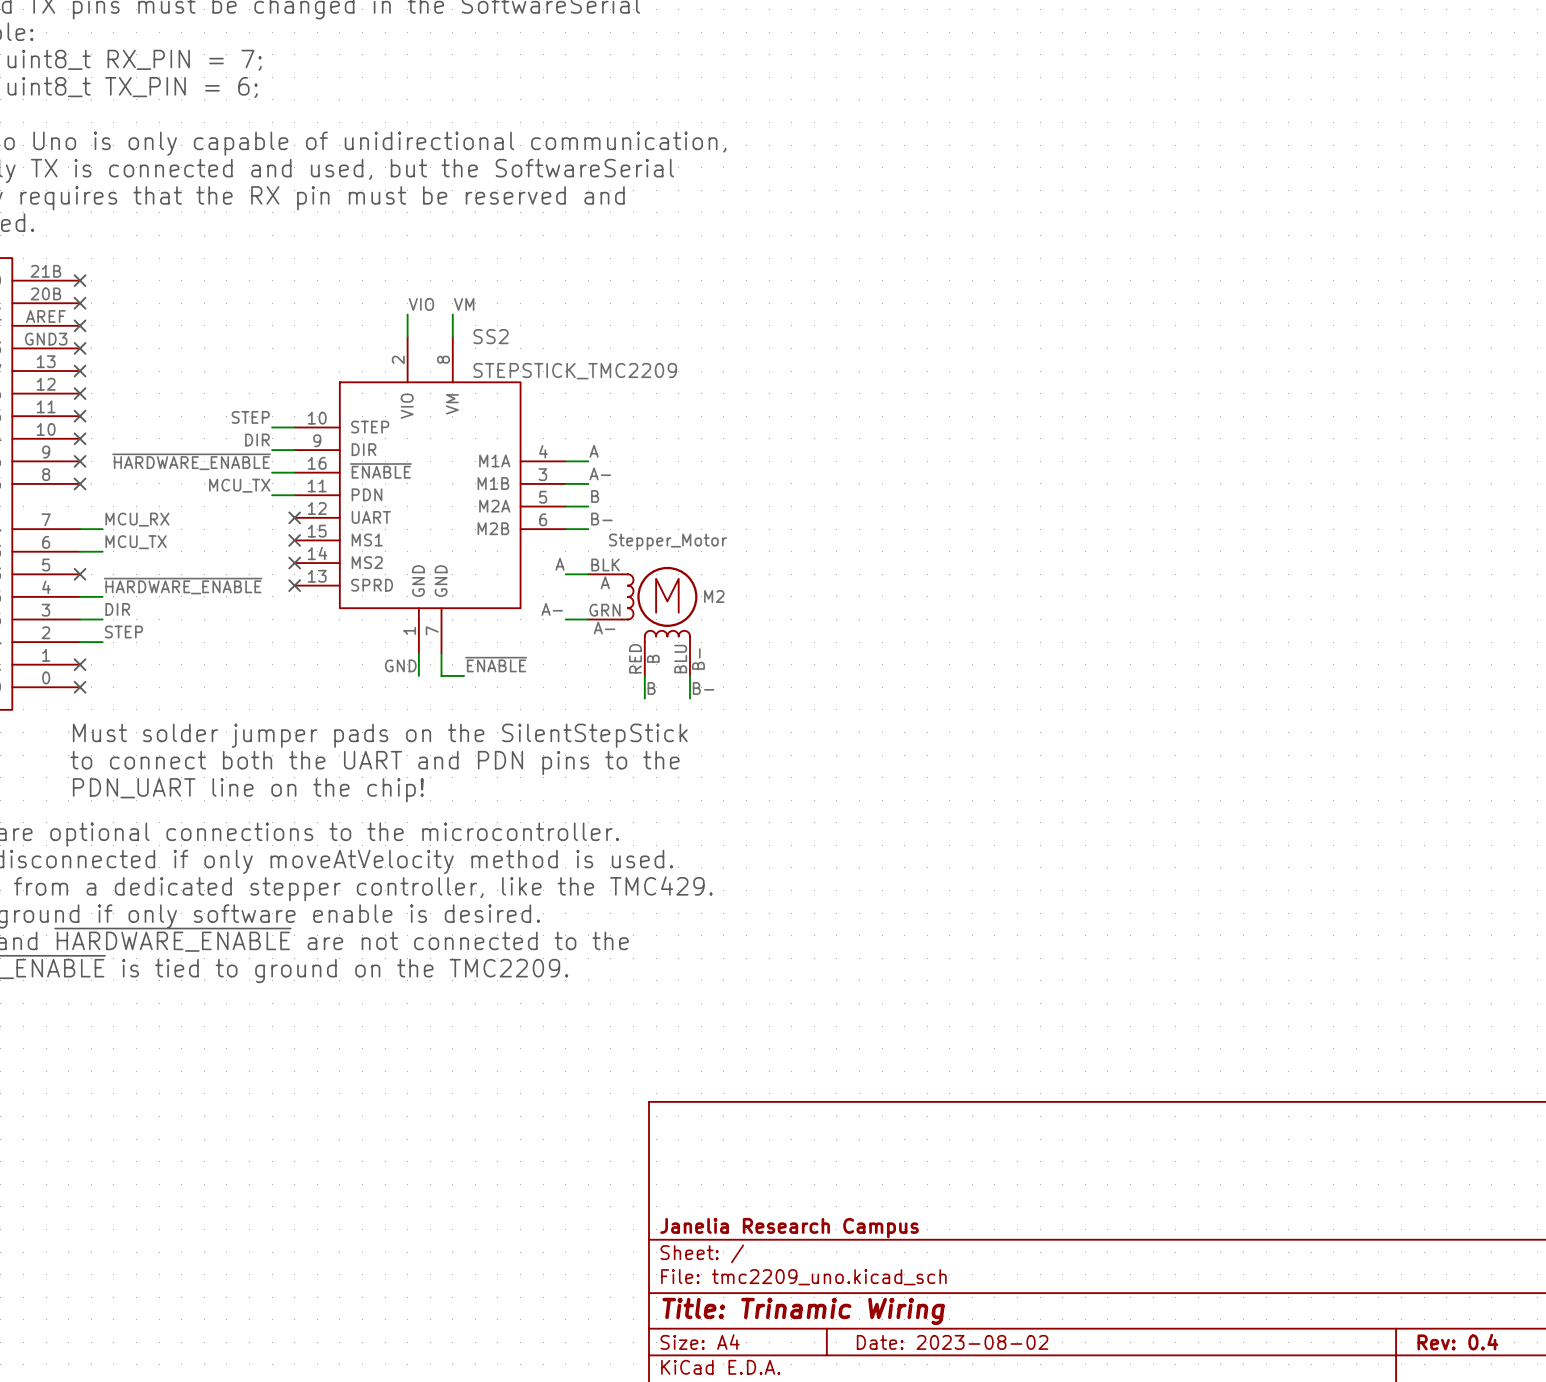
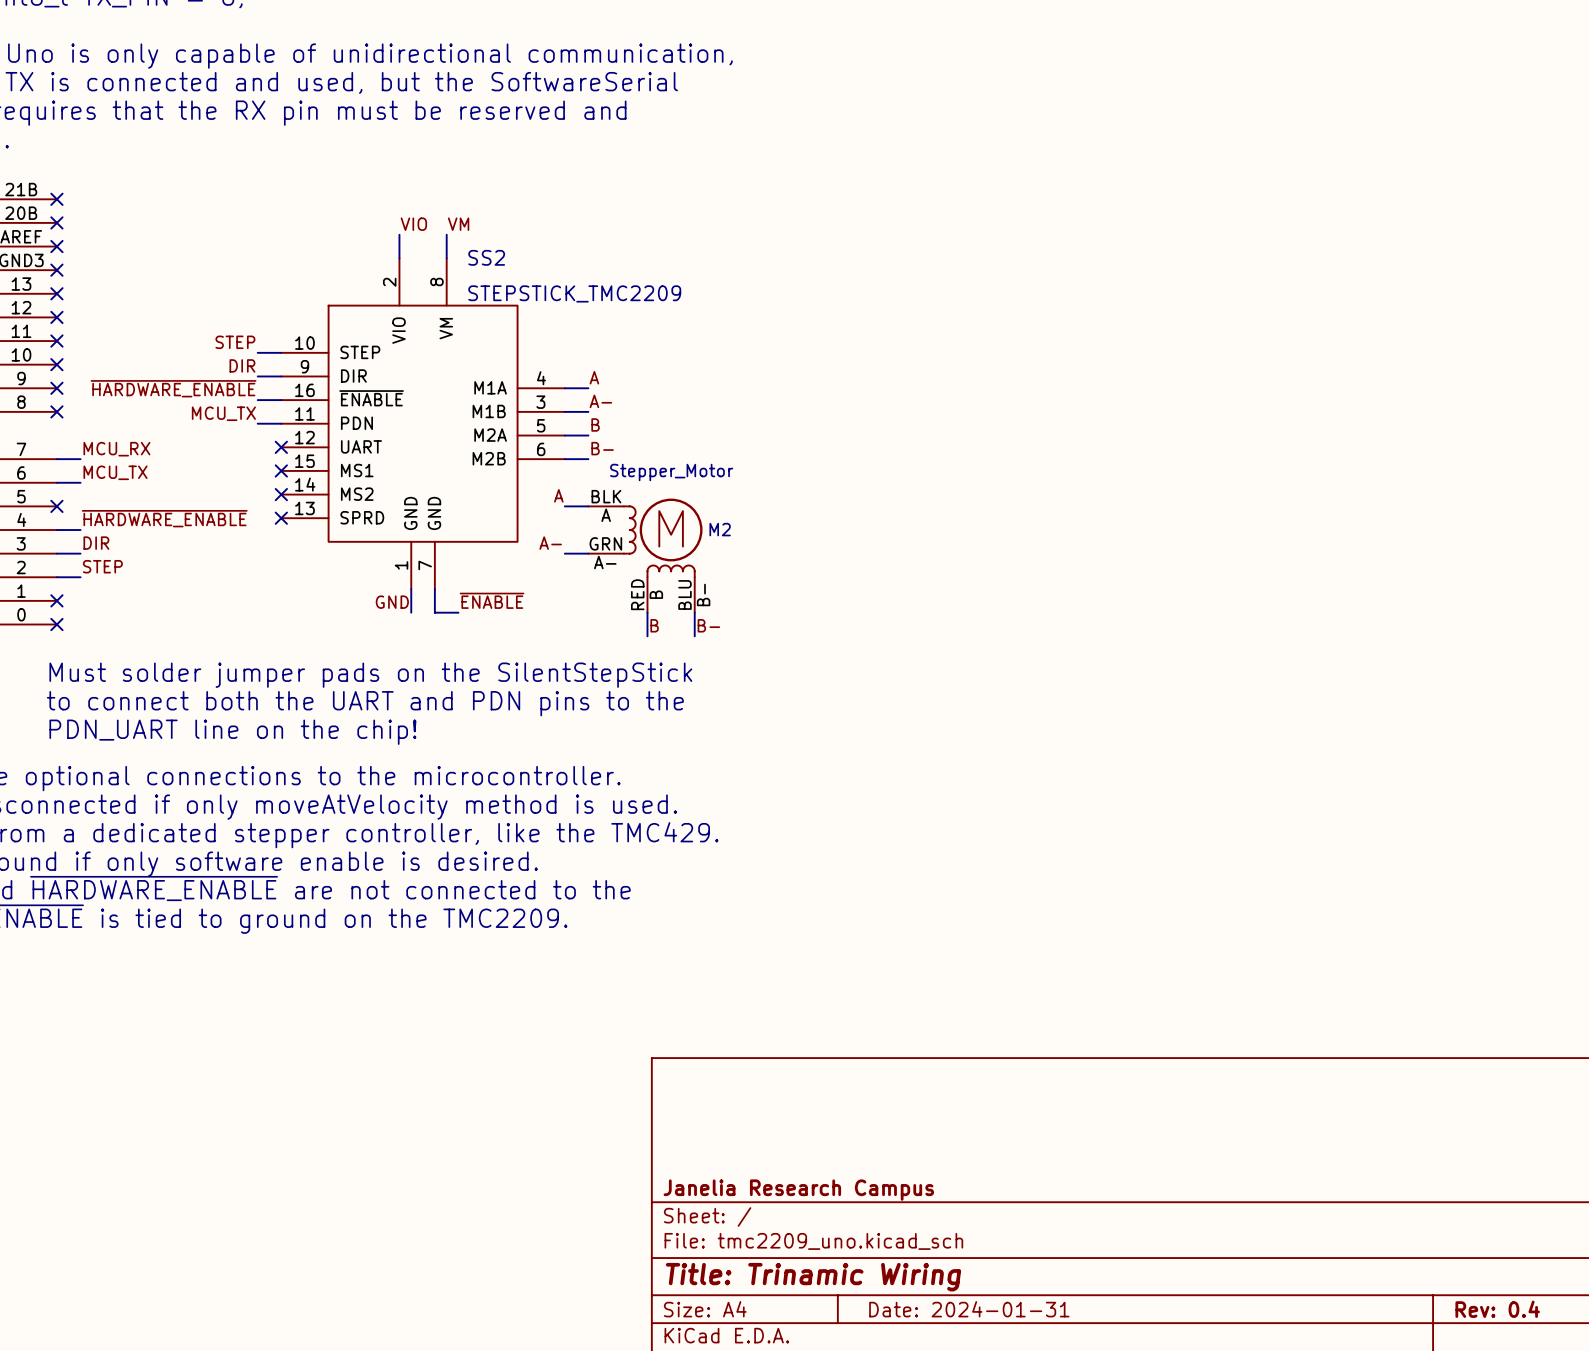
title block: Date: 2023-08-02 (952, 1342) -> Date: 2024-01-31 (969, 1309)

